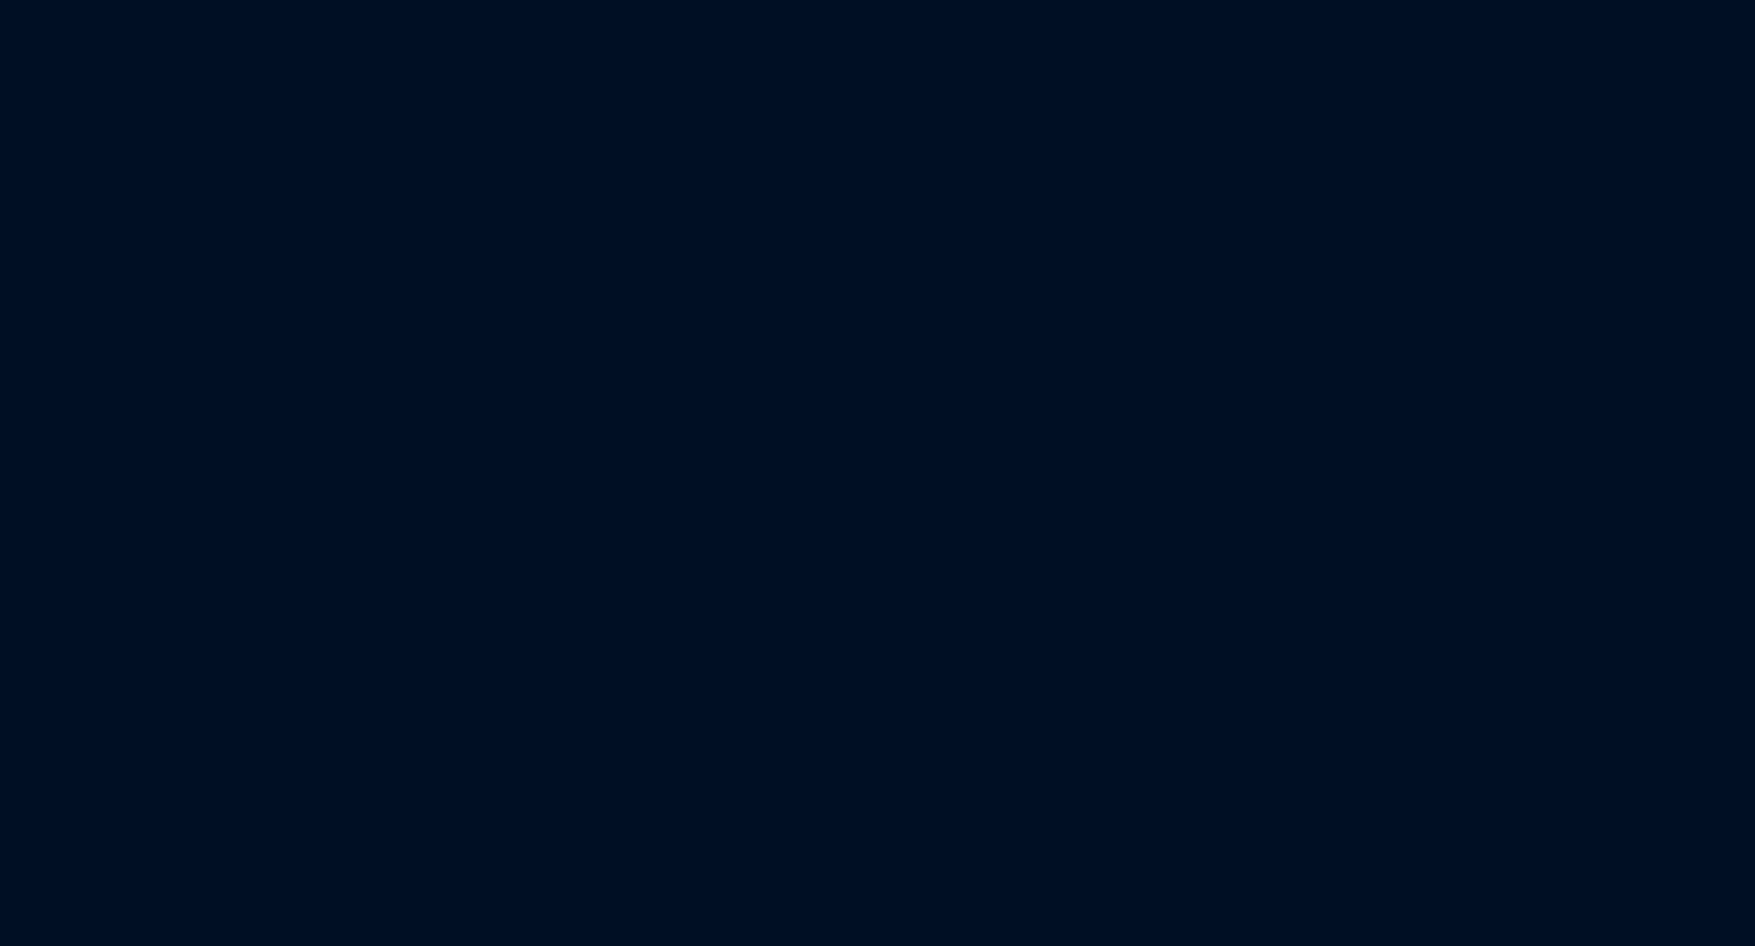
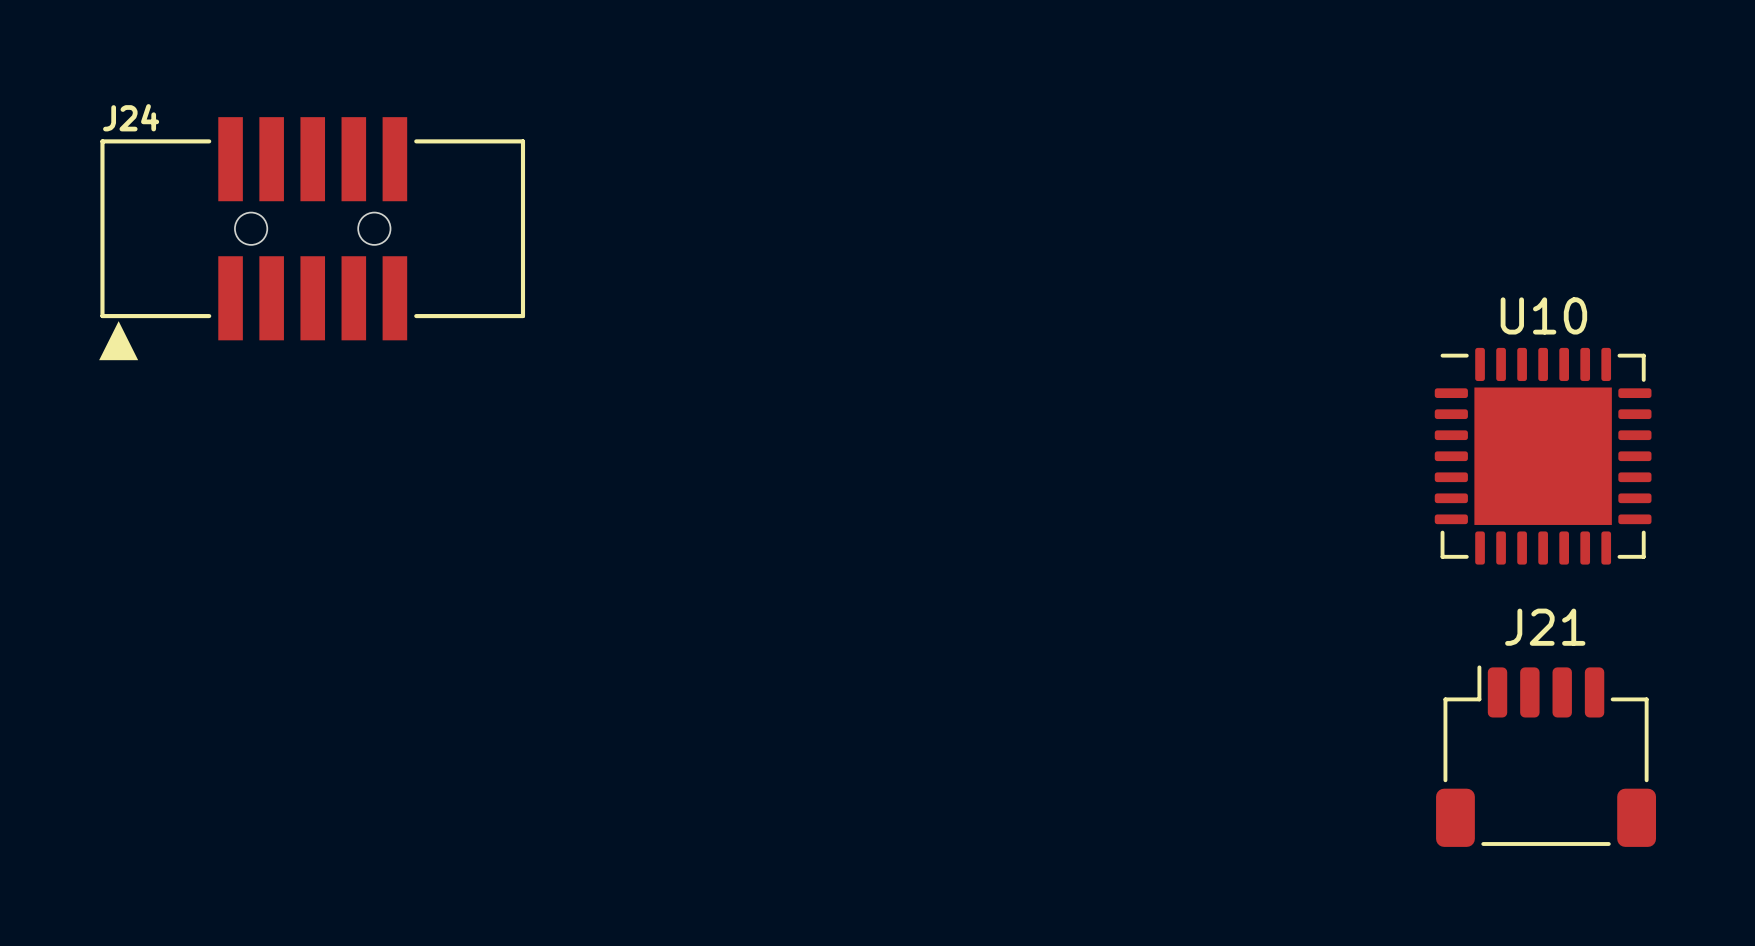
J24: none -> (312, 238)
U10: none -> (1543, 456)
J21: none -> (1546, 756)

